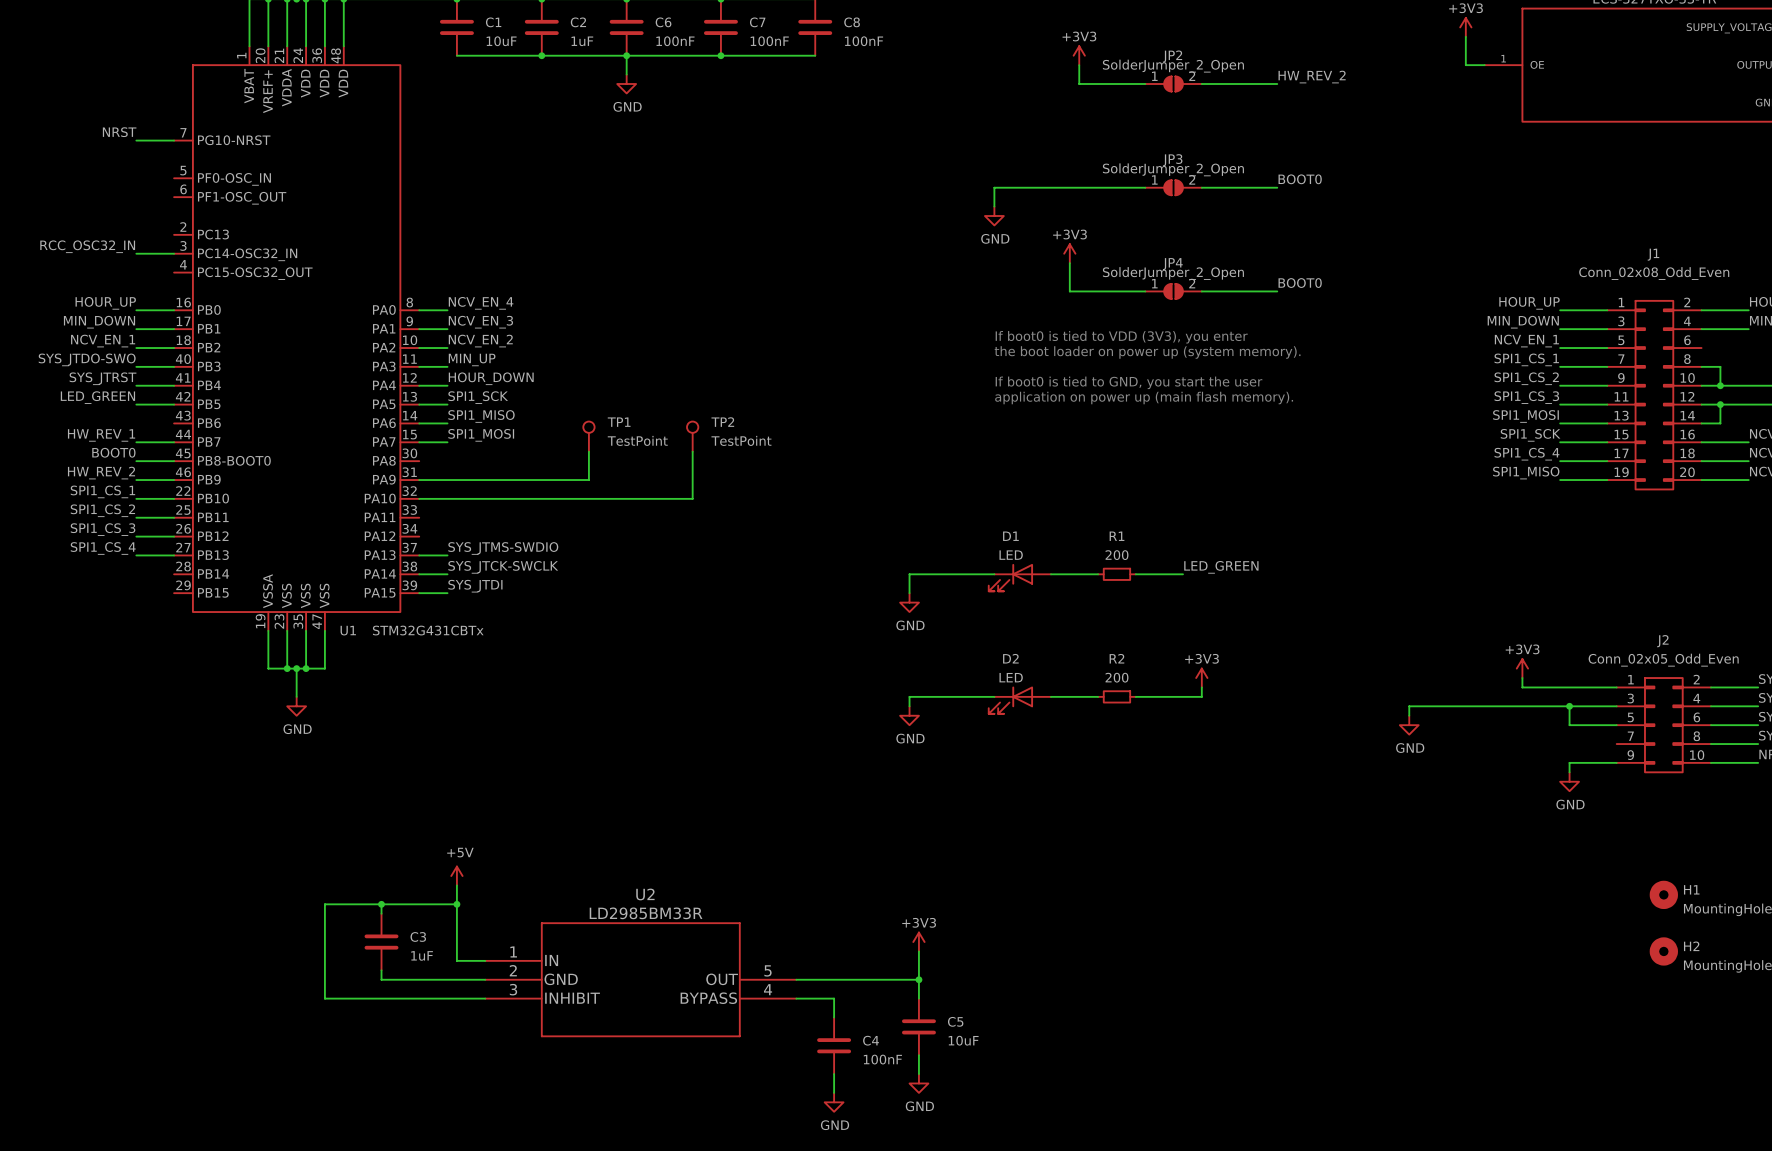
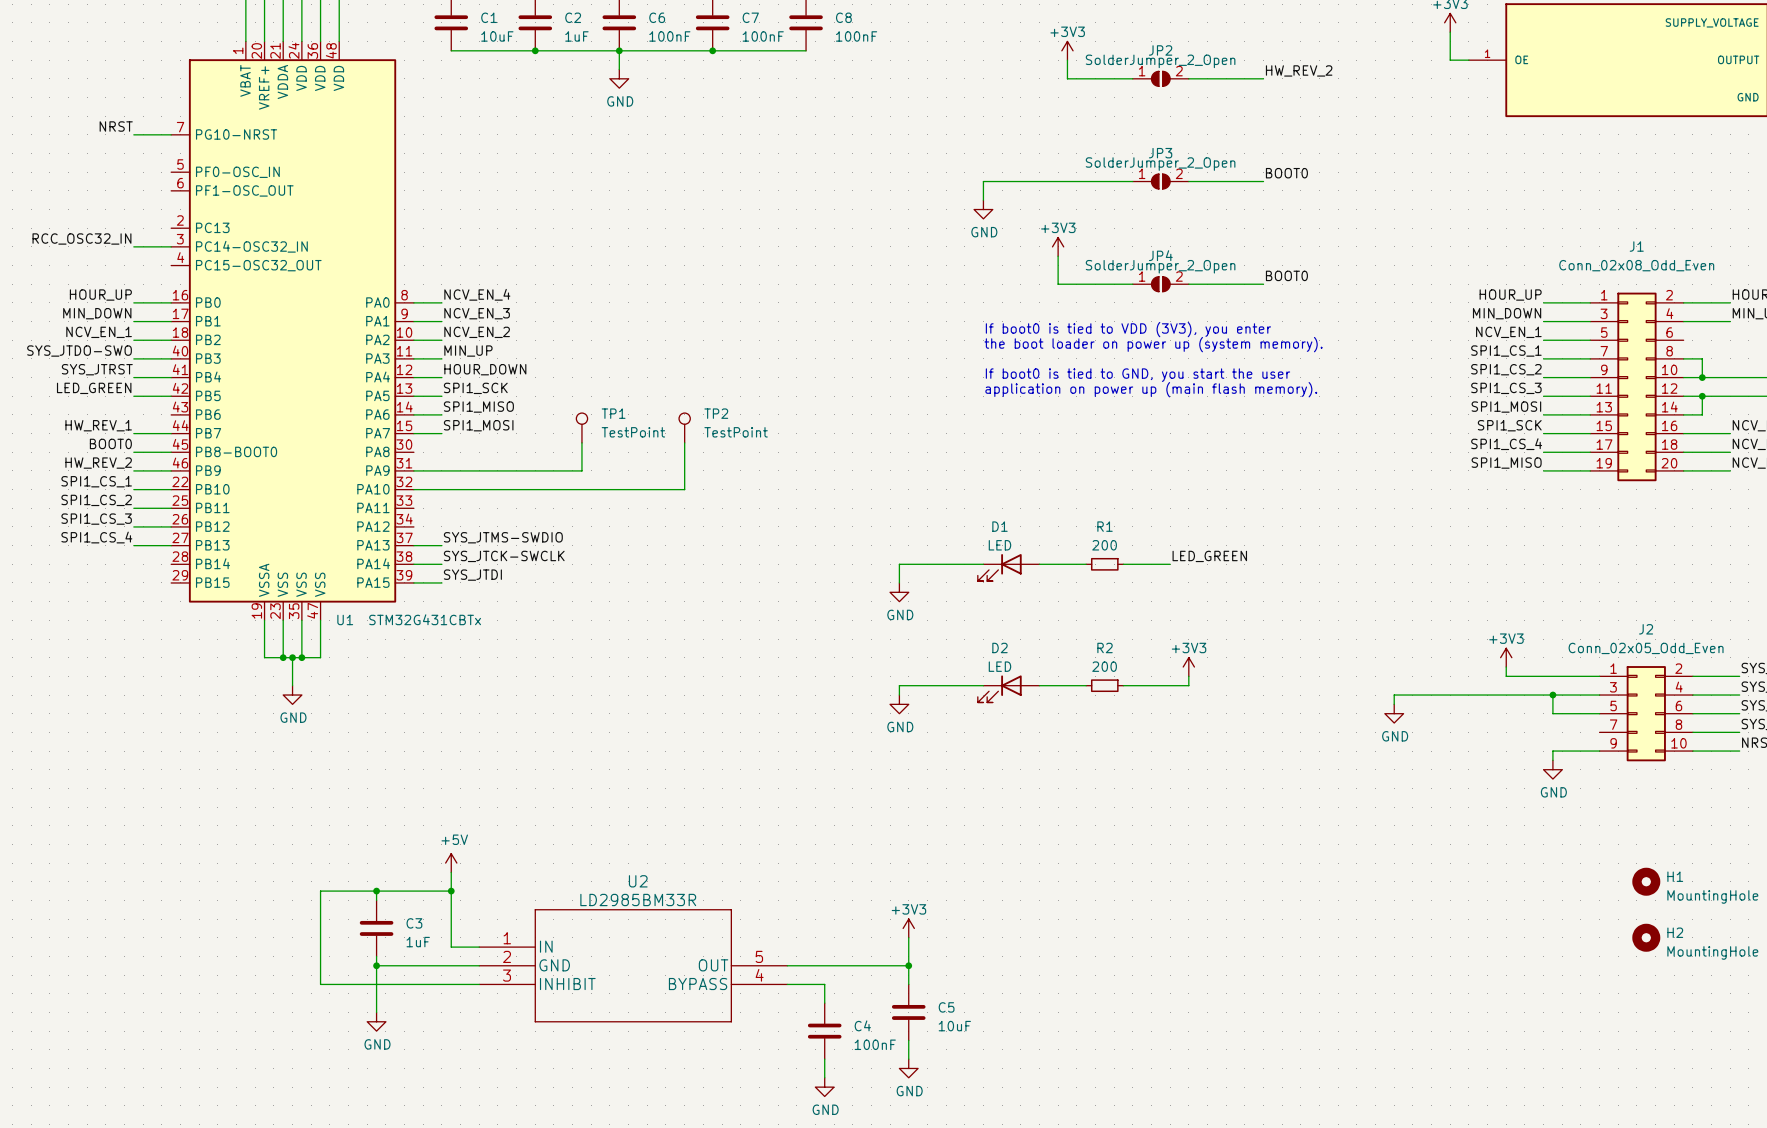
wire: none -> (376, 965) (376, 1012)
junction: none -> (376, 965)
power symbol: none -> GND (376, 1021)

